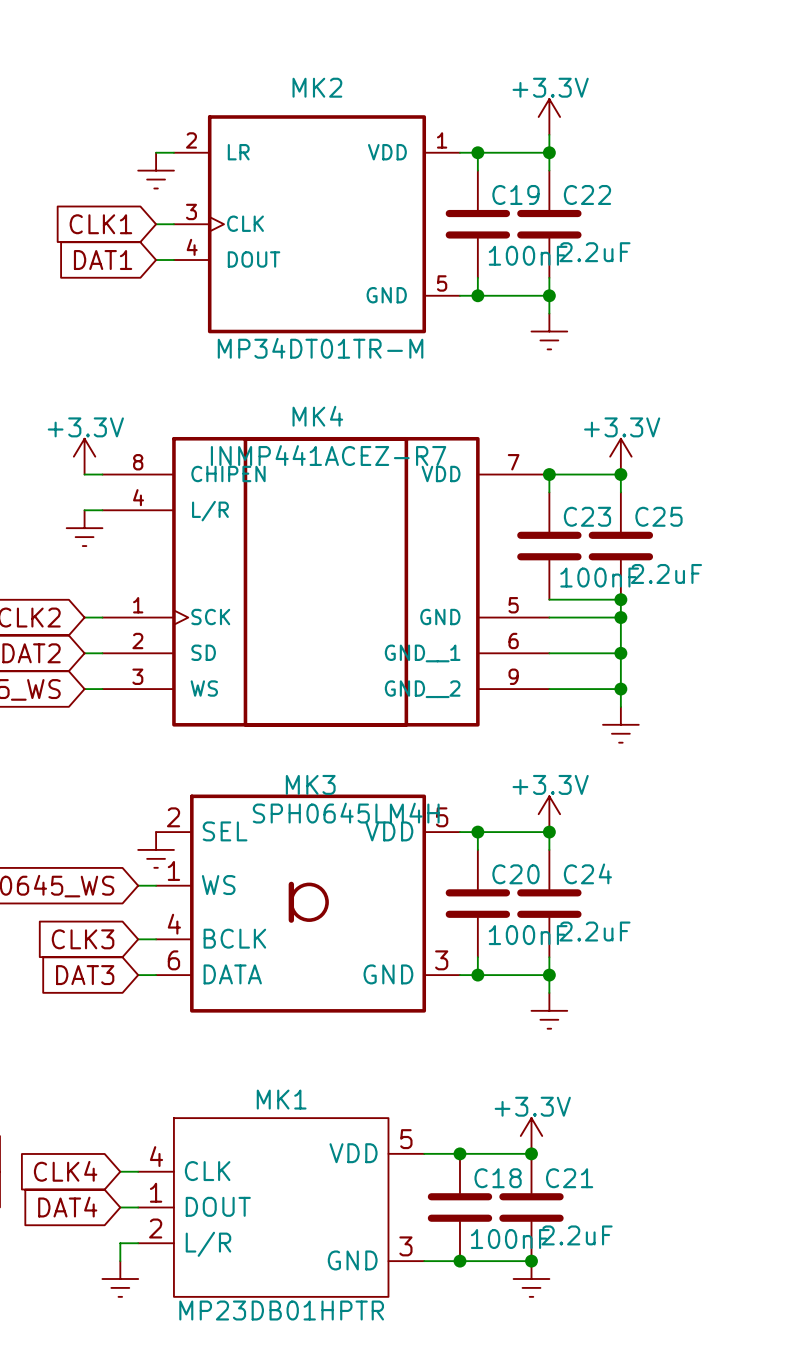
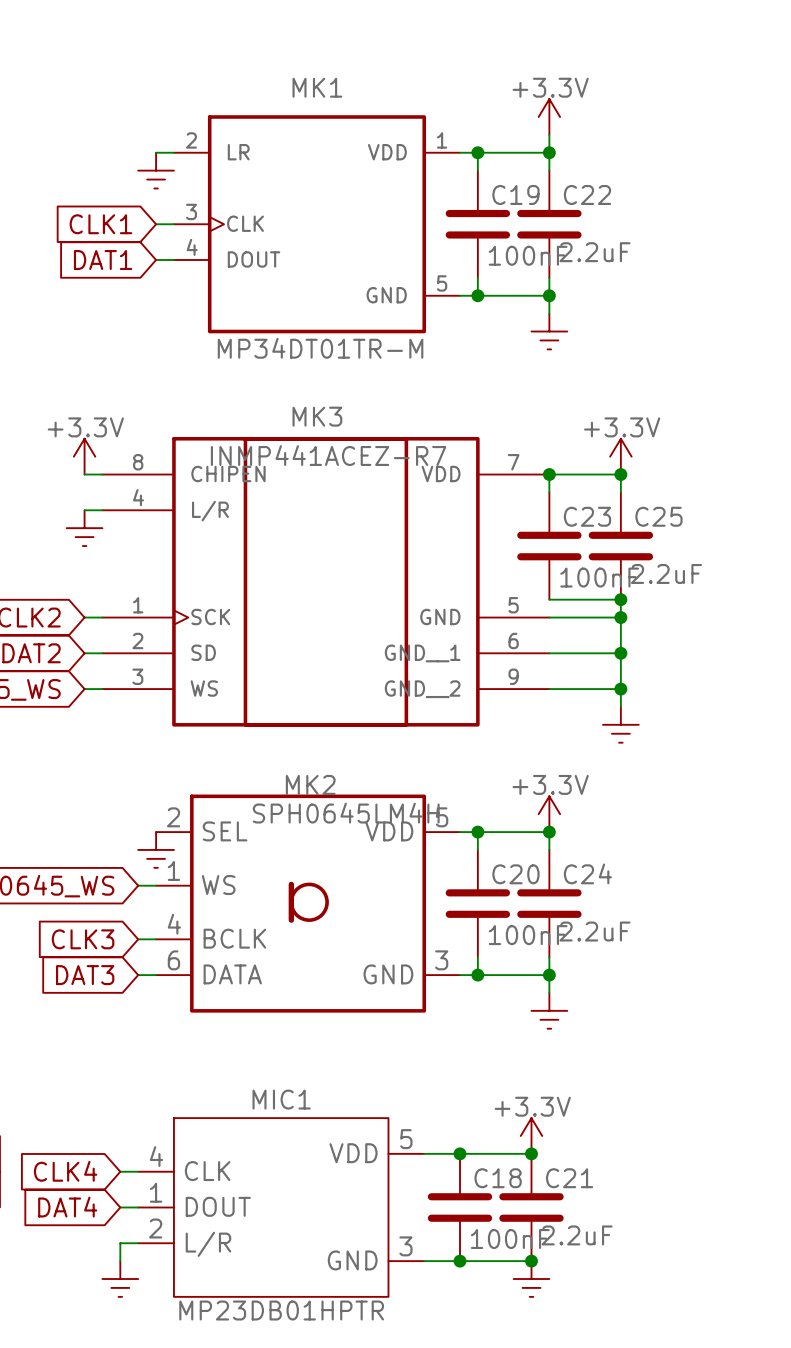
MK2 name: MK2 (317, 87) -> MK1 (317, 87)
MK4 name: MK4 (317, 416) -> MK3 (317, 416)
MK3 name: MK3 (310, 784) -> MK2 (310, 784)
MK1 name: MK1 (281, 1099) -> MIC1 (281, 1099)

